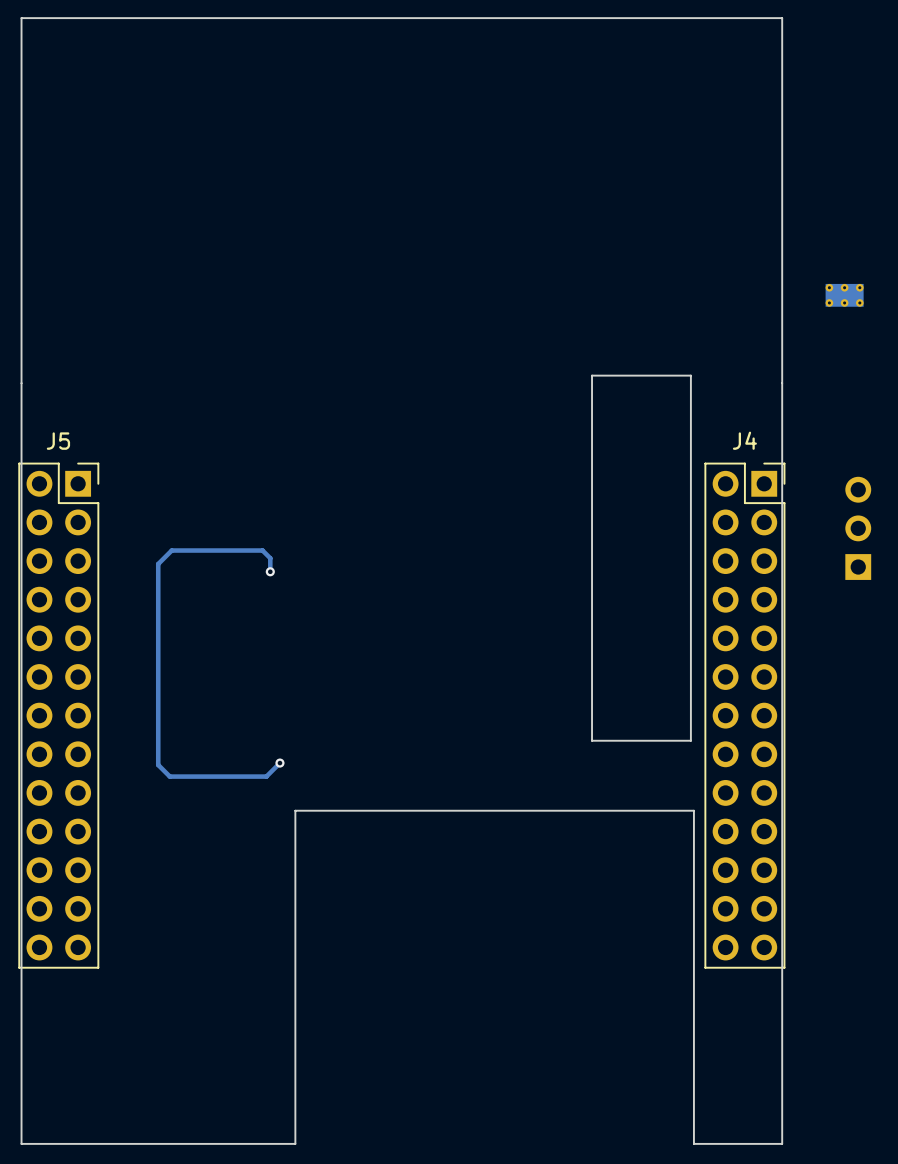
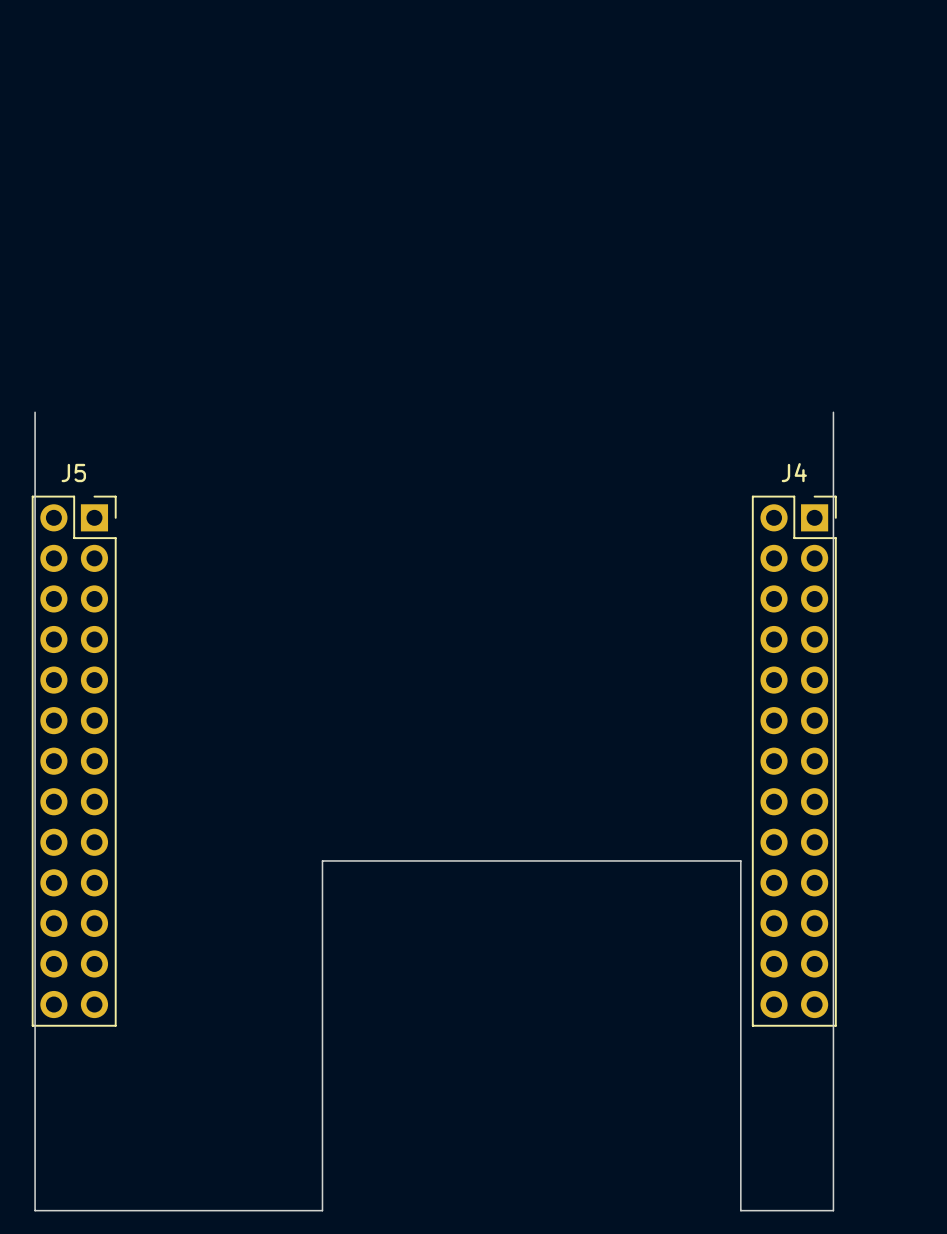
part: (844, 295) -> none
board edge: (690, 375) (592, 375) (592, 740) (690, 740) (690, 375) -> none
board edge: (782, 383) (782, 18) (21, 18) (21, 383) -> none
part: (858, 528) -> none
track: (270, 571) (270, 558) (262, 550) (171, 550) (158, 564) (158, 764) (169, 776) (266, 776) (279, 763) -> none
via: (270, 571) -> none
via: (279, 763) -> none

